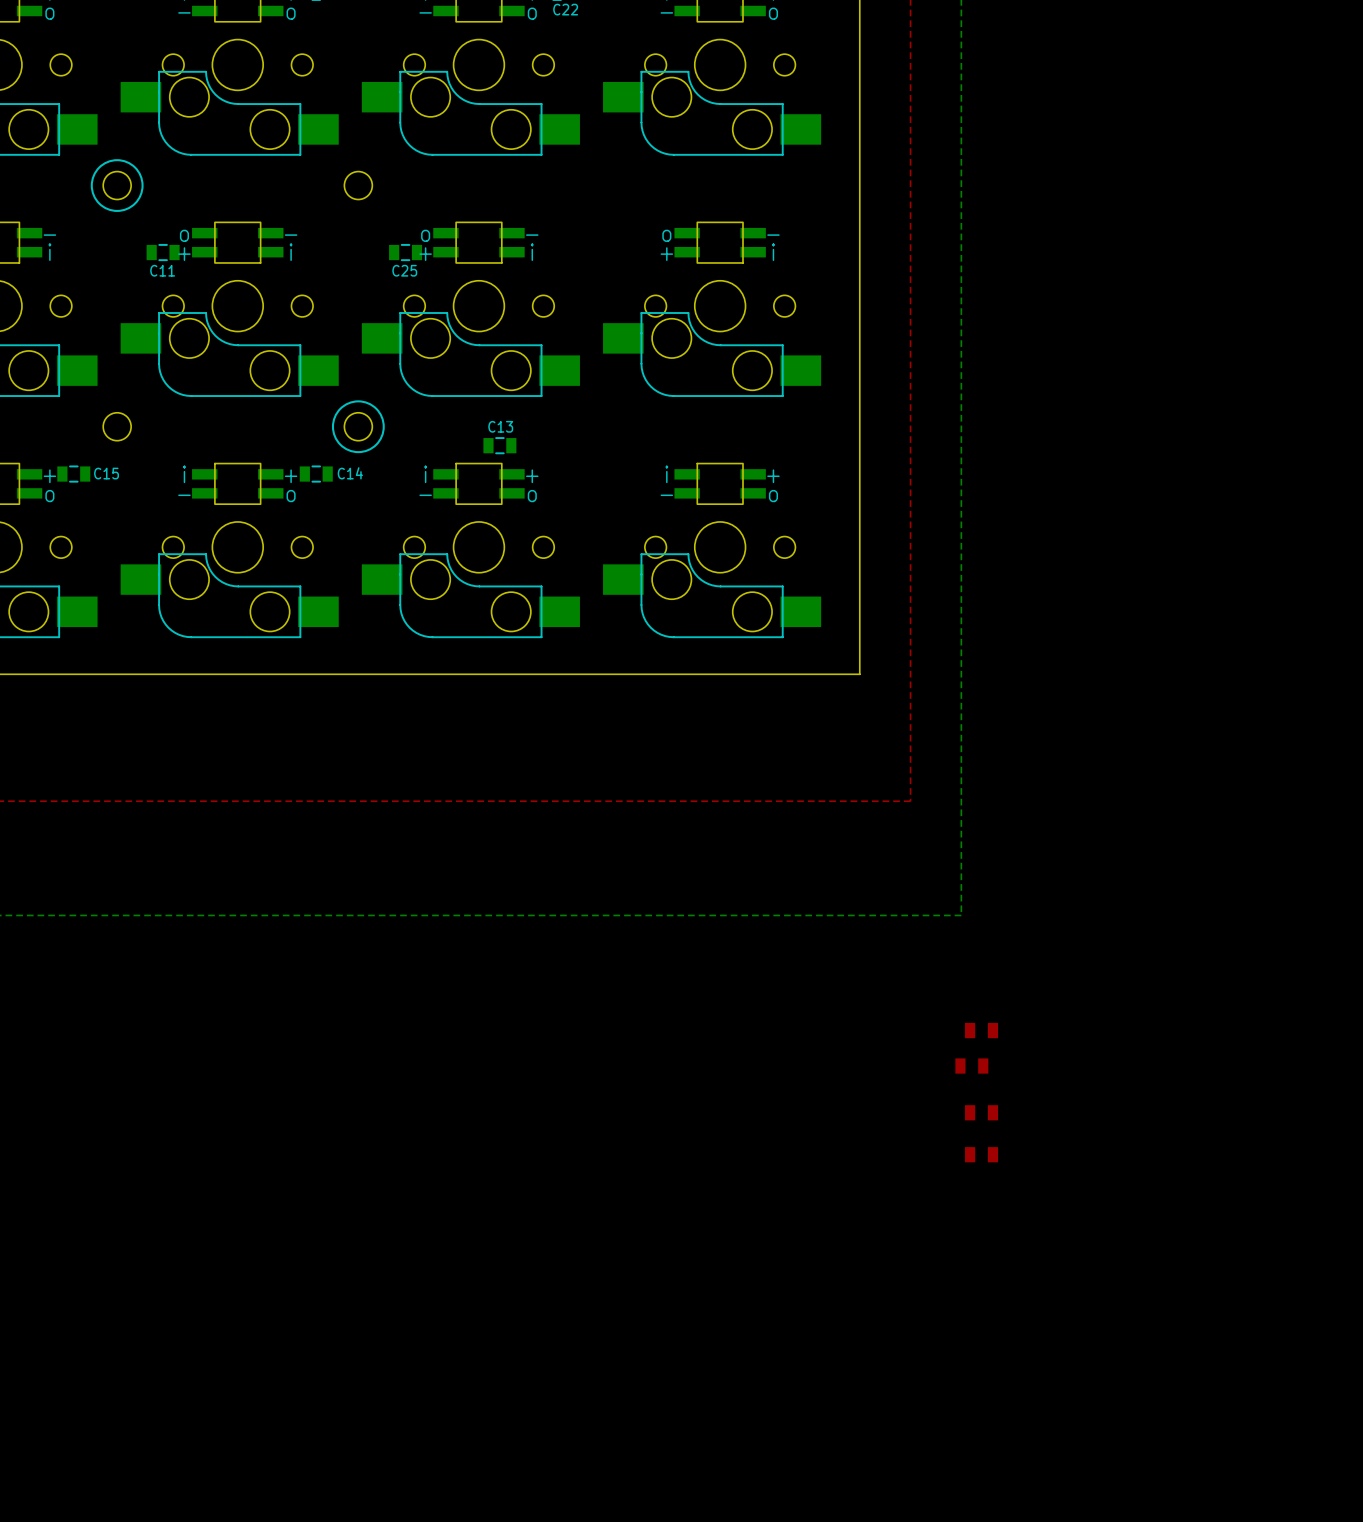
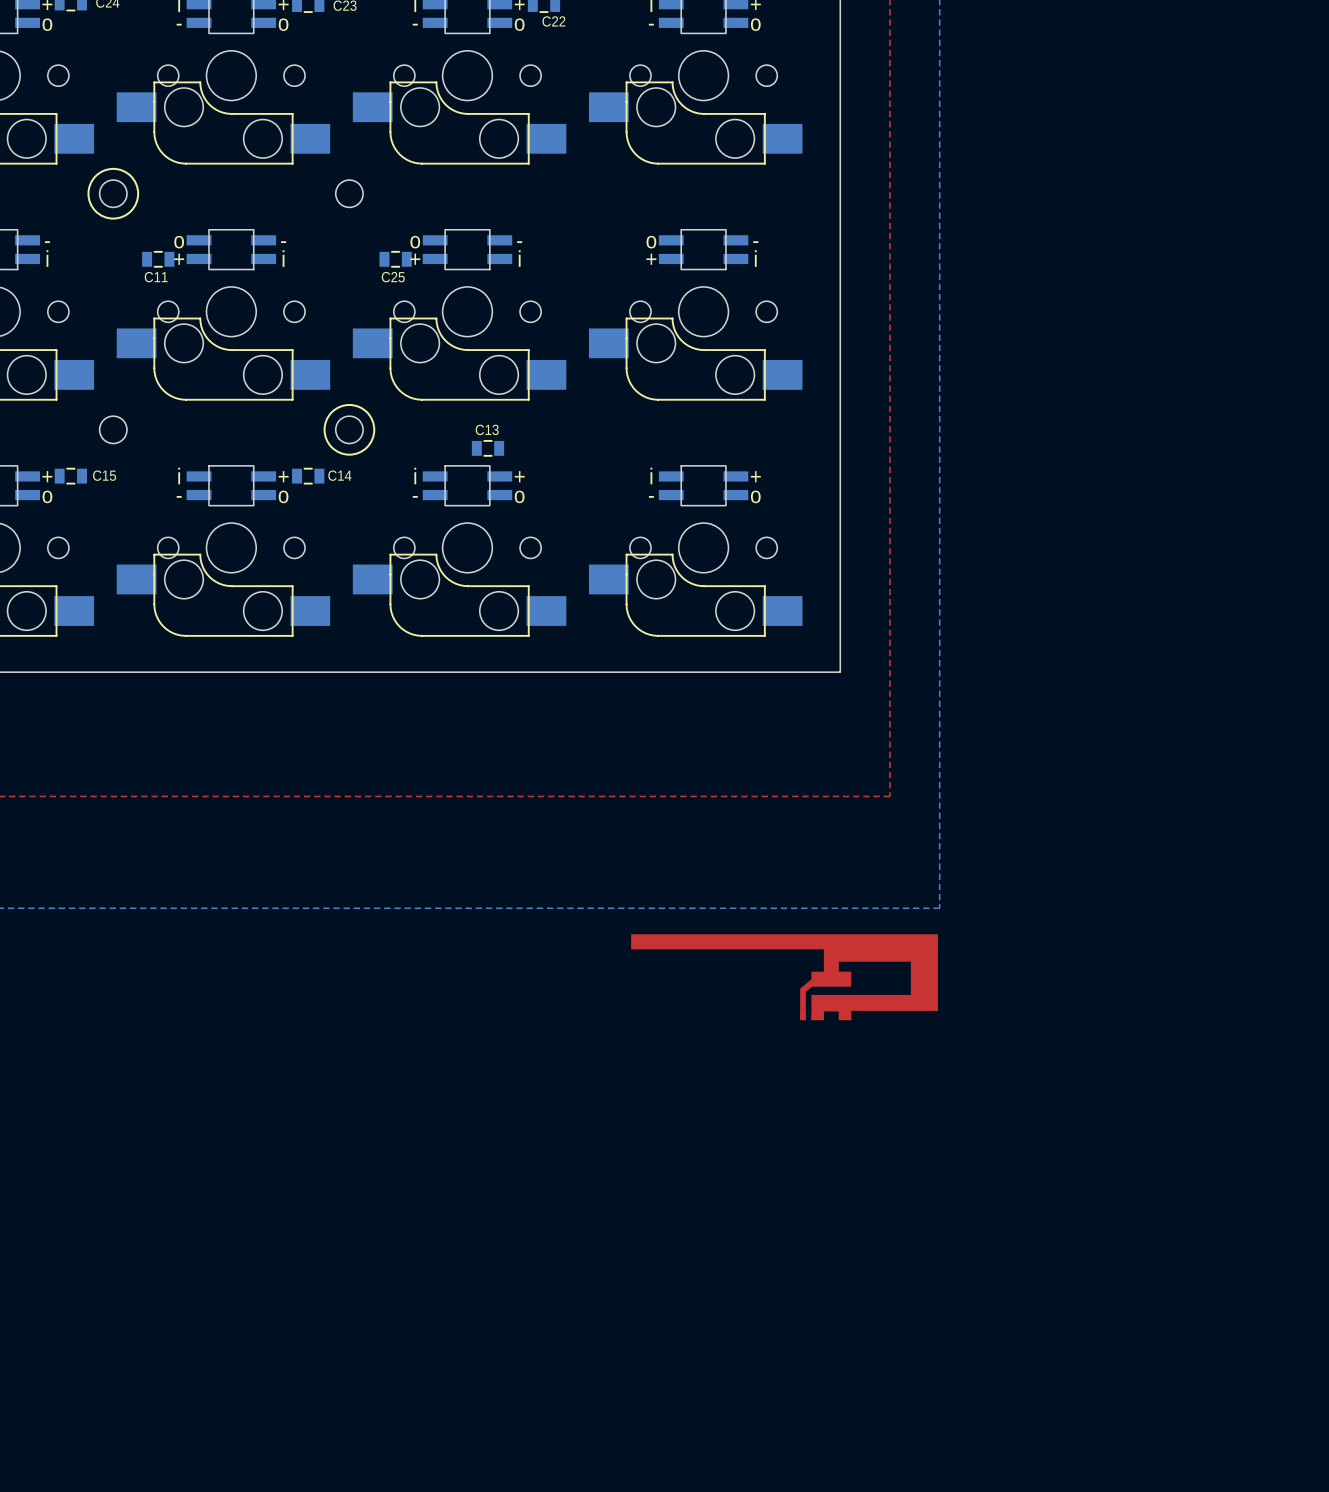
part: none -> (784, 977)
part: (981, 1030) -> none
part: (971, 1066) -> none
part: (981, 1112) -> none
part: (981, 1154) -> none

